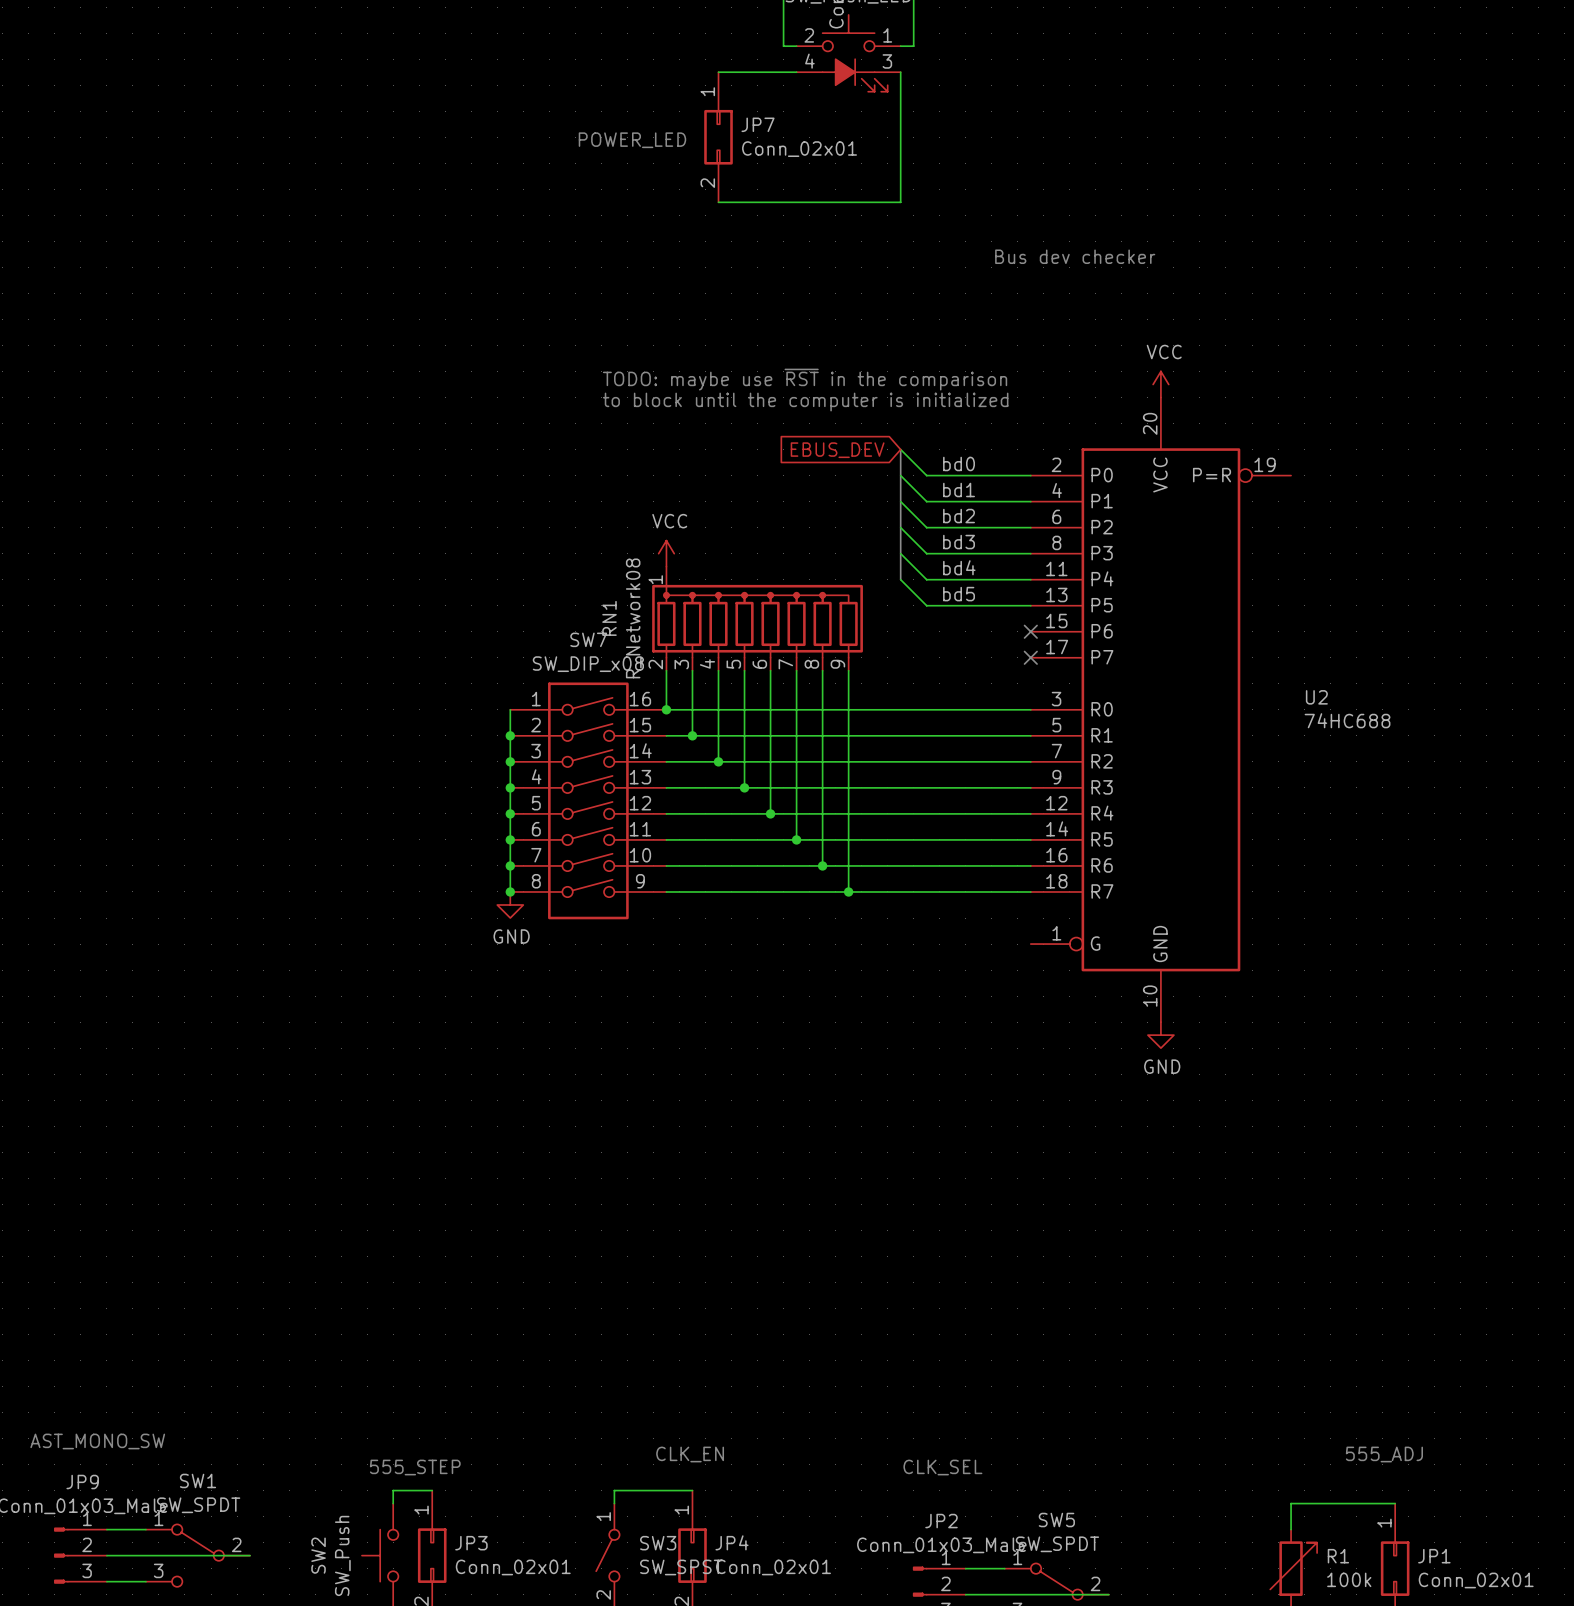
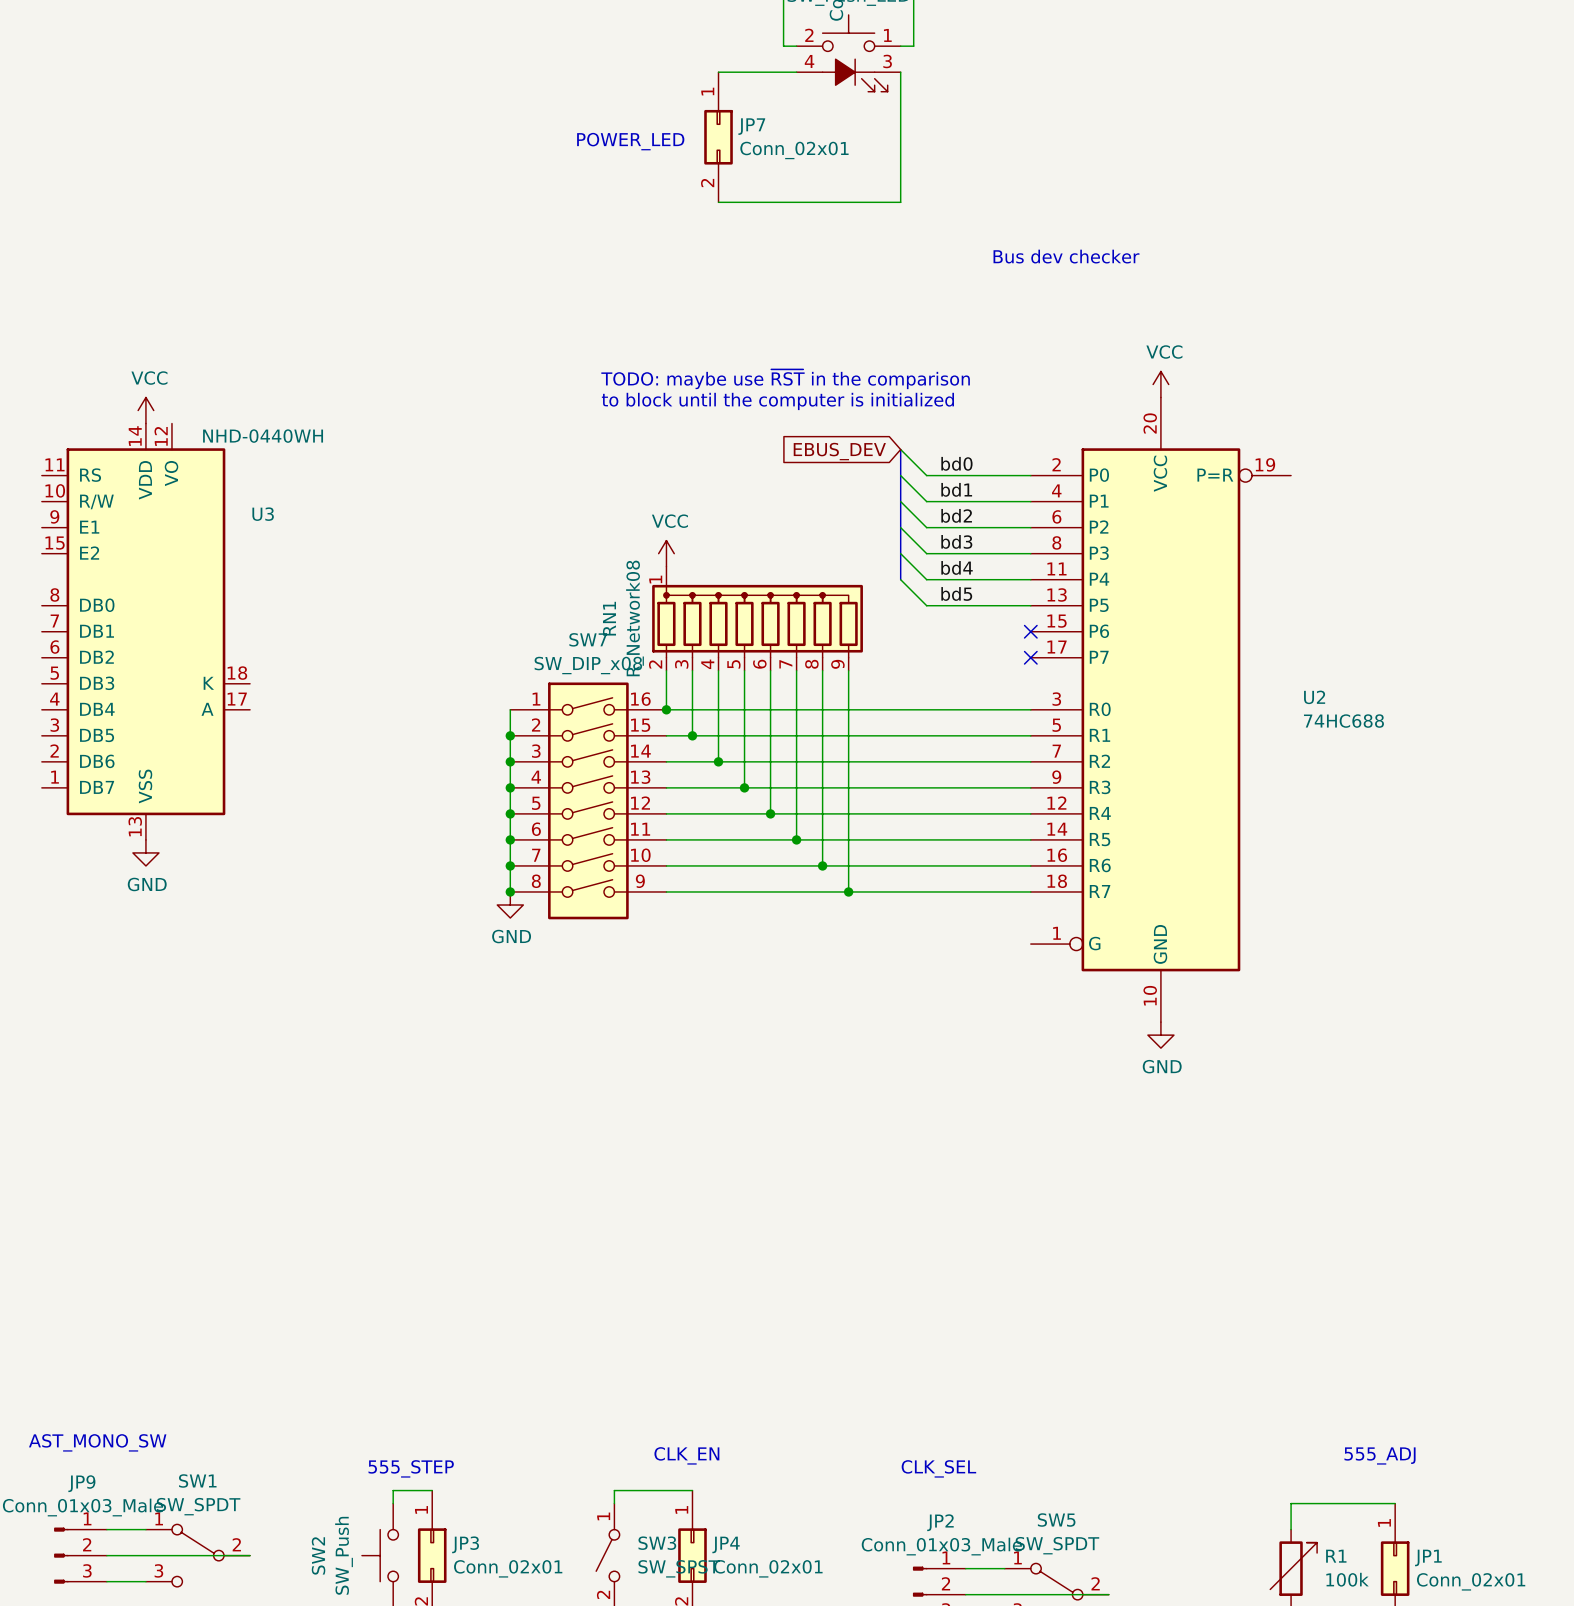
power symbol: none -> VCC (145, 410)
U3: none -> NHD-0440WH (145, 631)
power symbol: none -> GND (145, 852)

